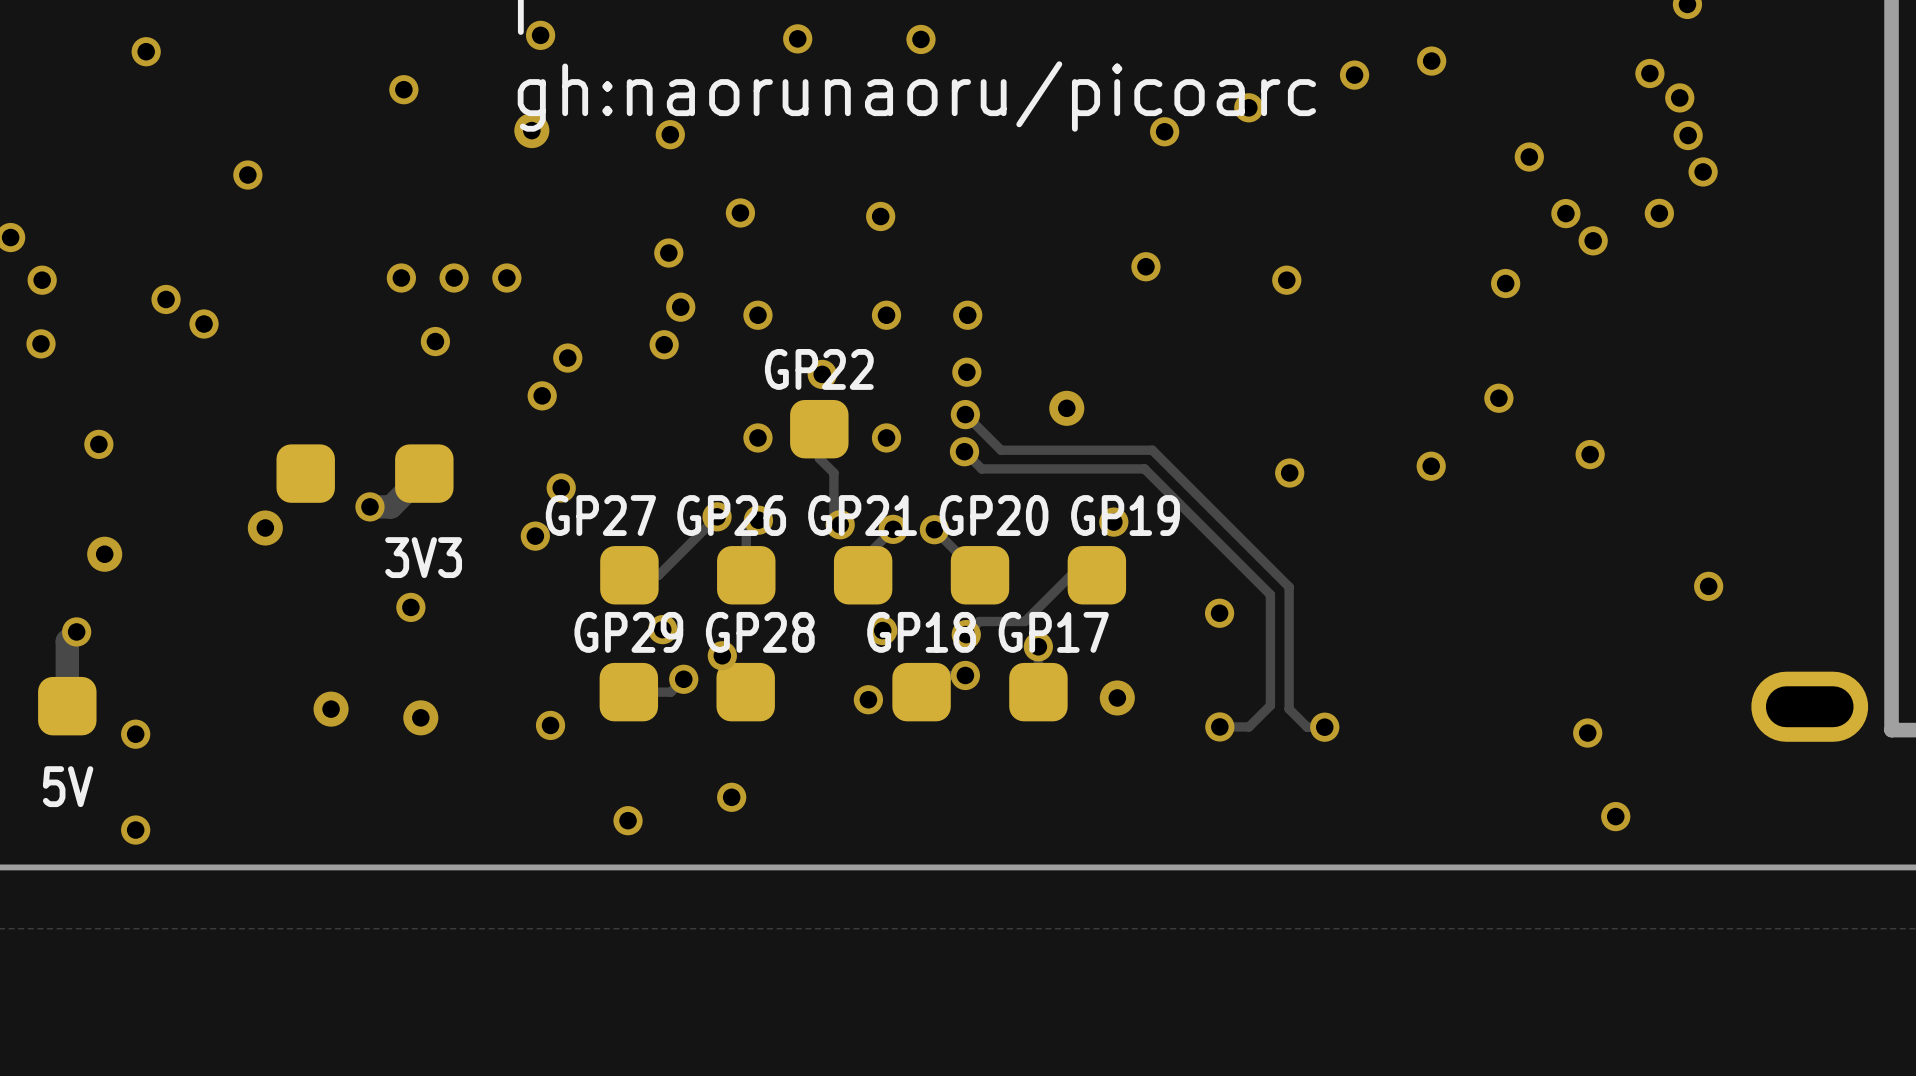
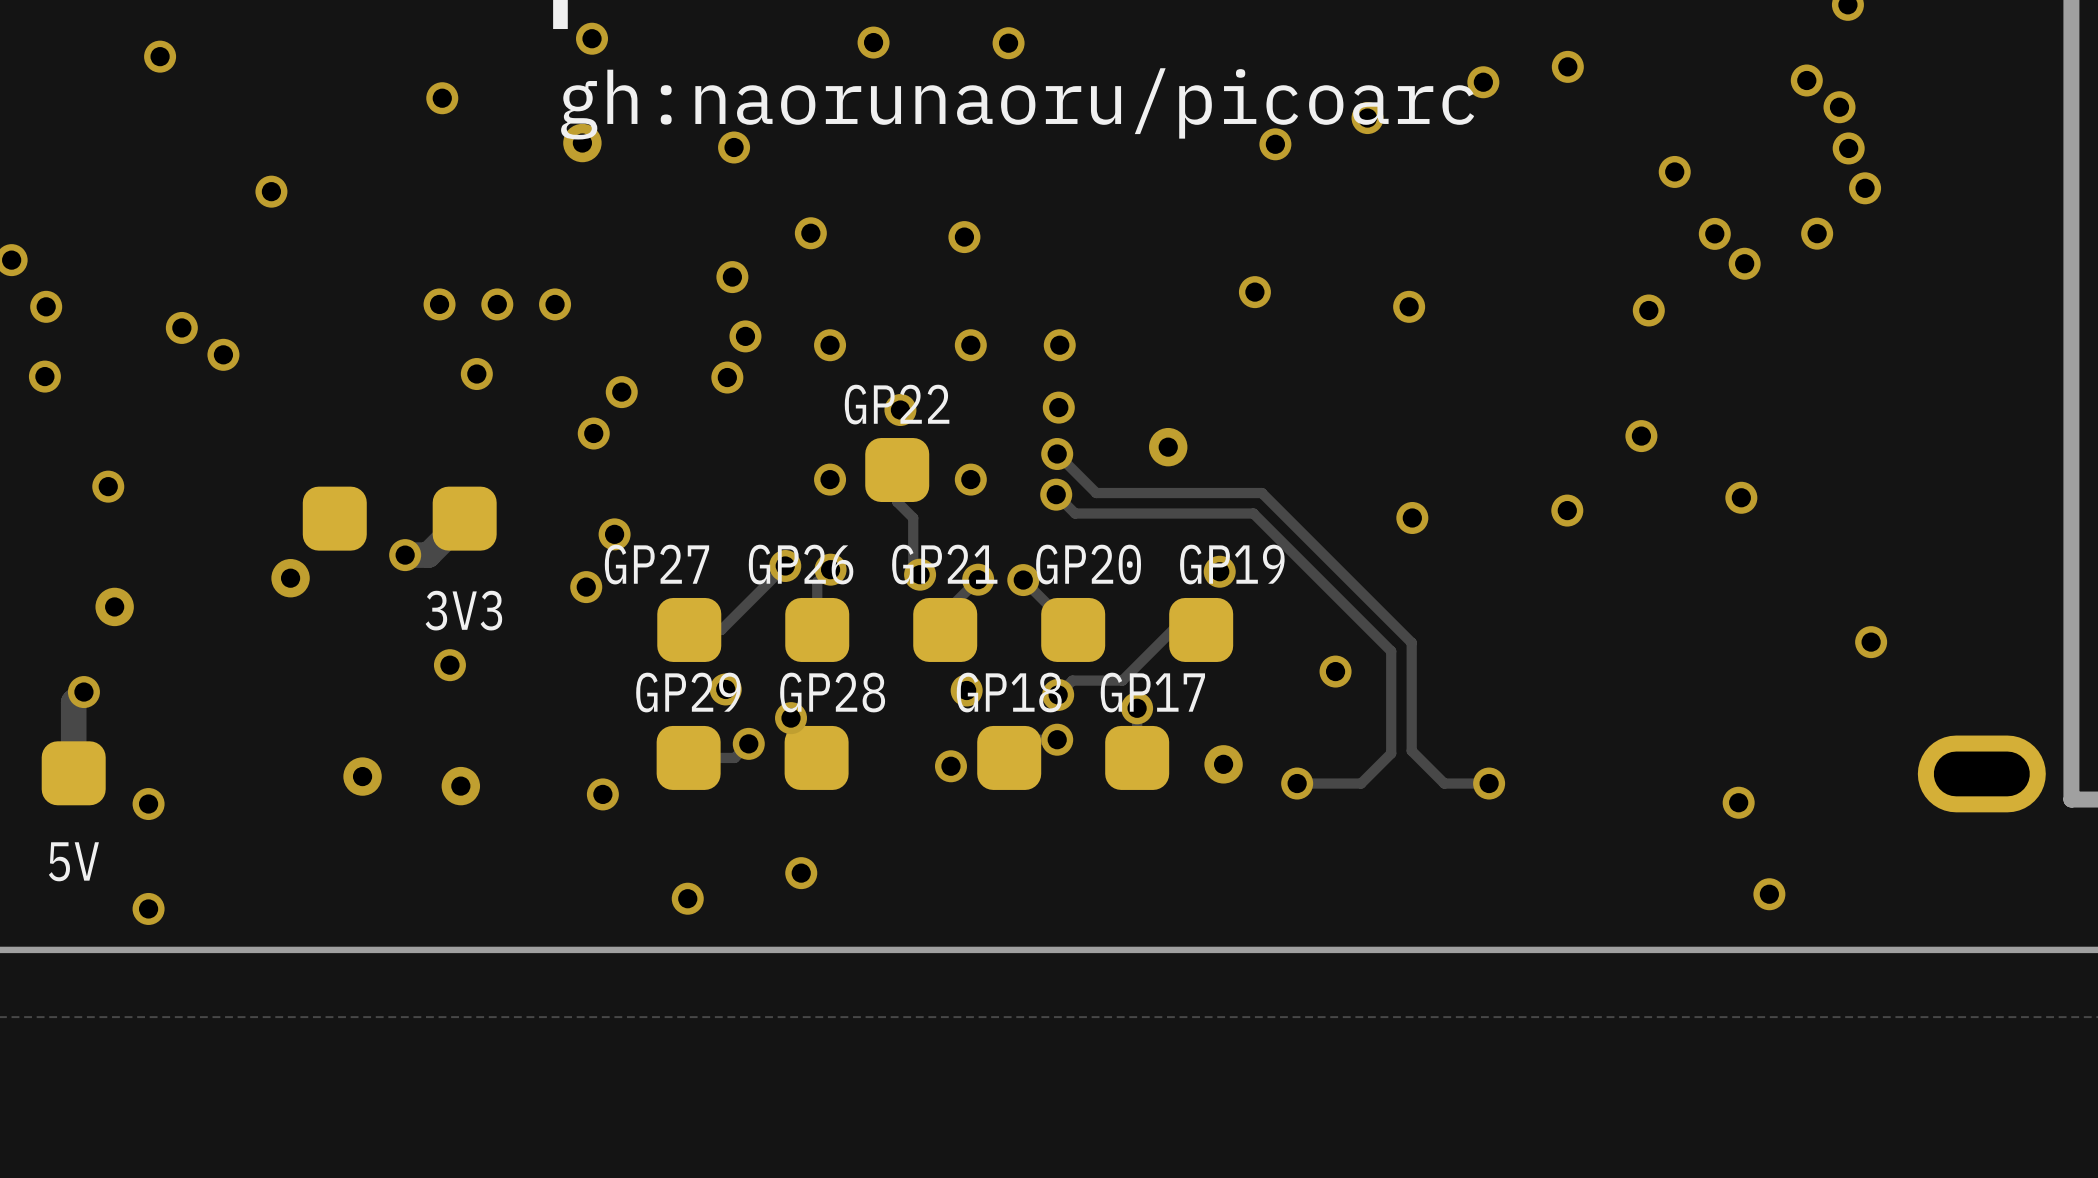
track: (1289, 685) (1289, 709) (1307, 727) (1324, 727) -> (1411, 750) (1444, 783) (1489, 783)
track: (1270, 688) (1270, 705) (1249, 726) (1219, 726) -> (1391, 753) (1361, 783) (1297, 783)
via position: (1219, 726) -> (1297, 783)
via position: (1324, 727) -> (1489, 783)

